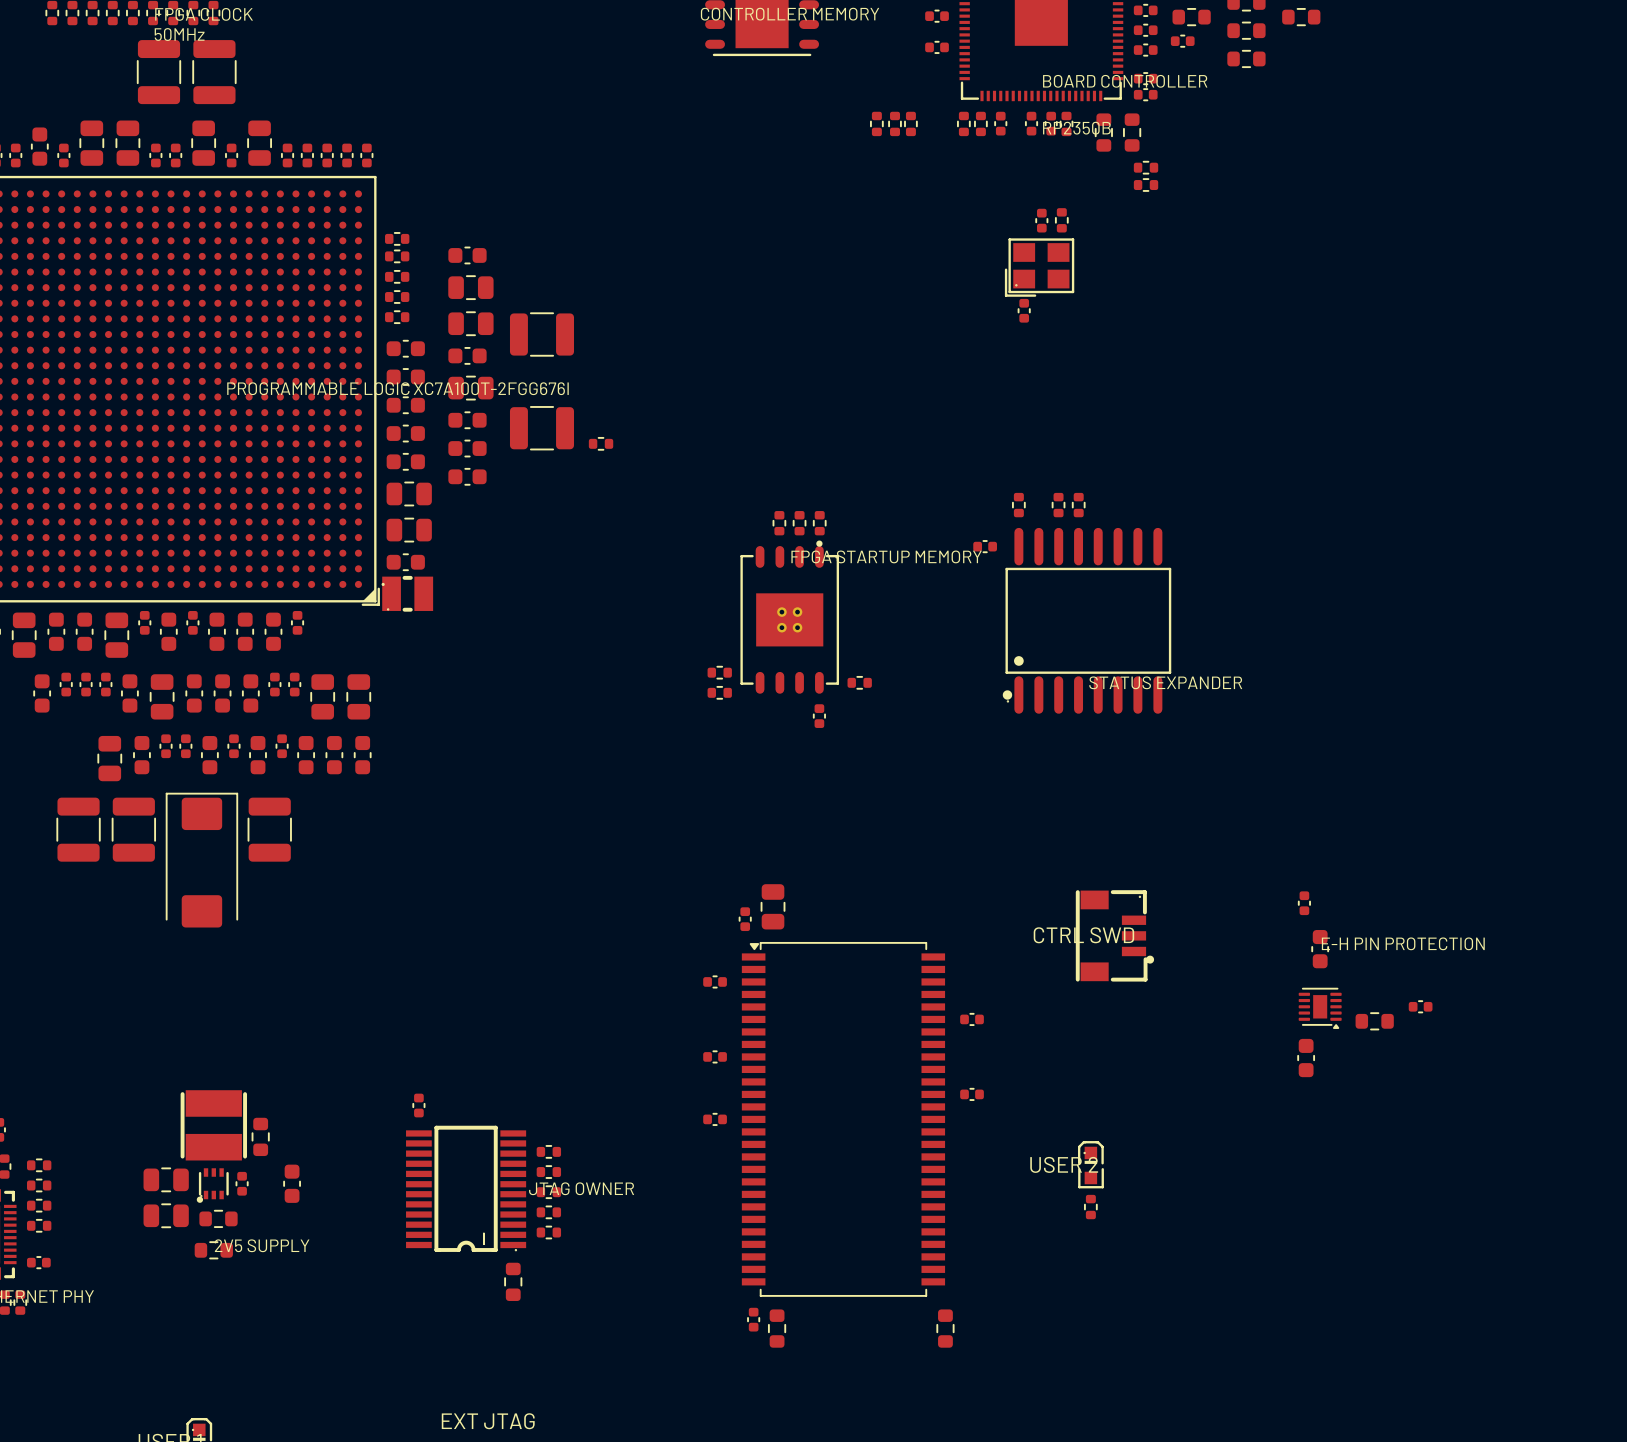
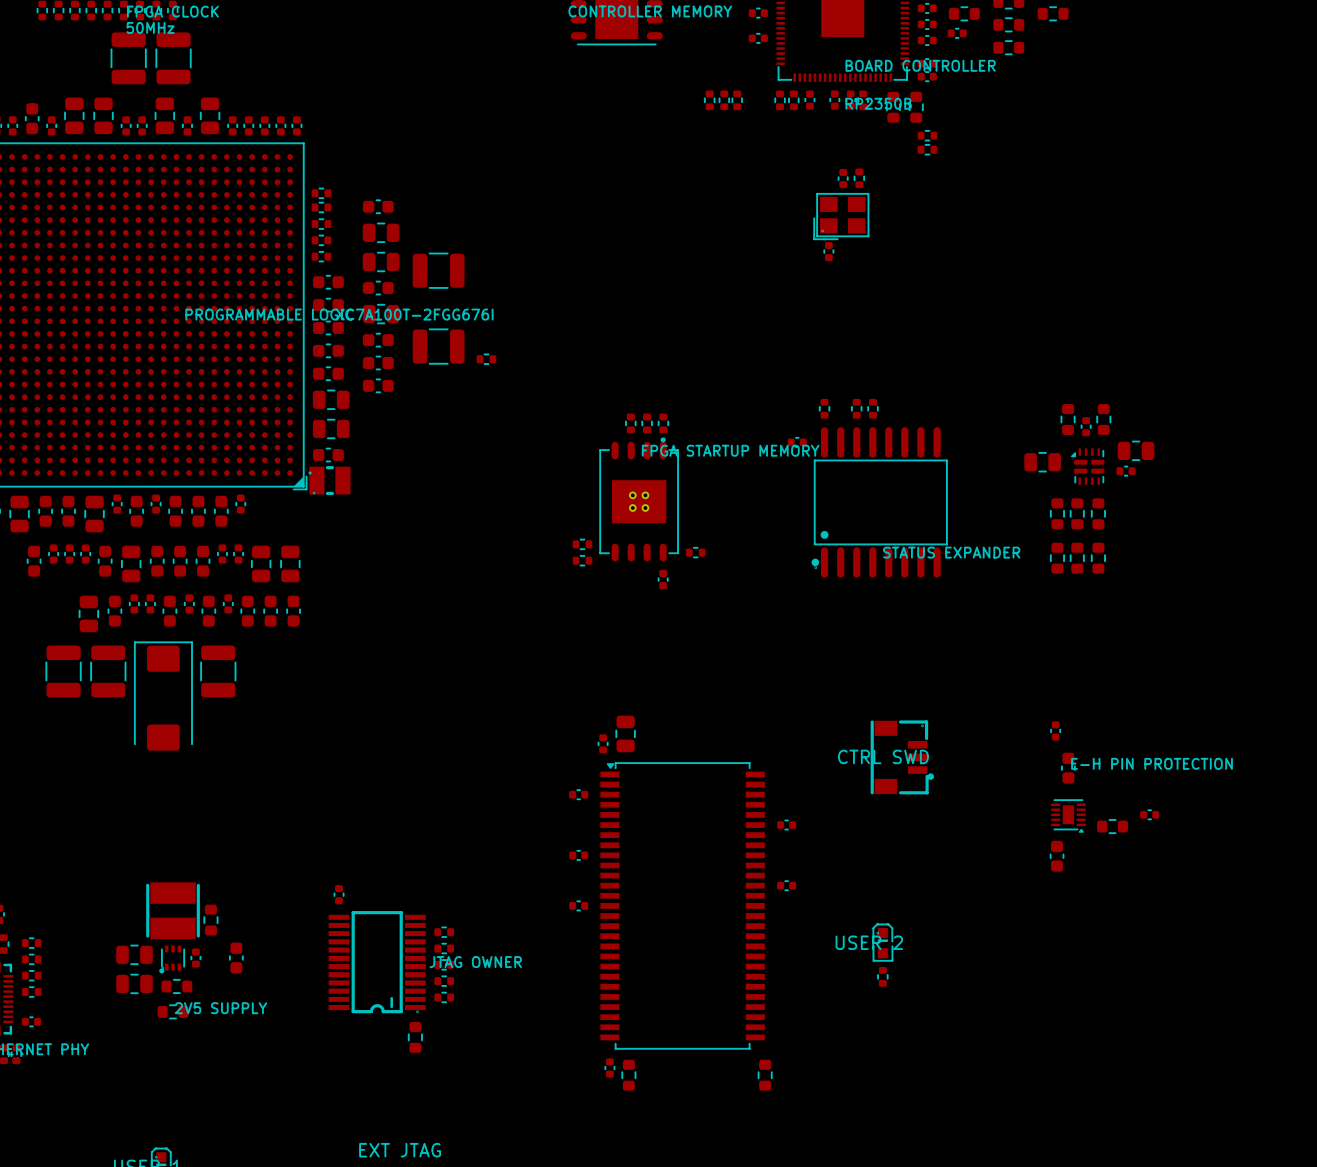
part: none -> (1068, 419)
part: none -> (1103, 419)
part: none -> (1086, 426)
part: none -> (1136, 450)
part: none -> (1042, 462)
part: none -> (1087, 466)
part: none -> (1126, 471)
part: none -> (1057, 513)
part: none -> (1077, 513)
part: none -> (1098, 513)
part: none -> (1057, 558)
part: none -> (1077, 558)
part: none -> (1098, 558)

